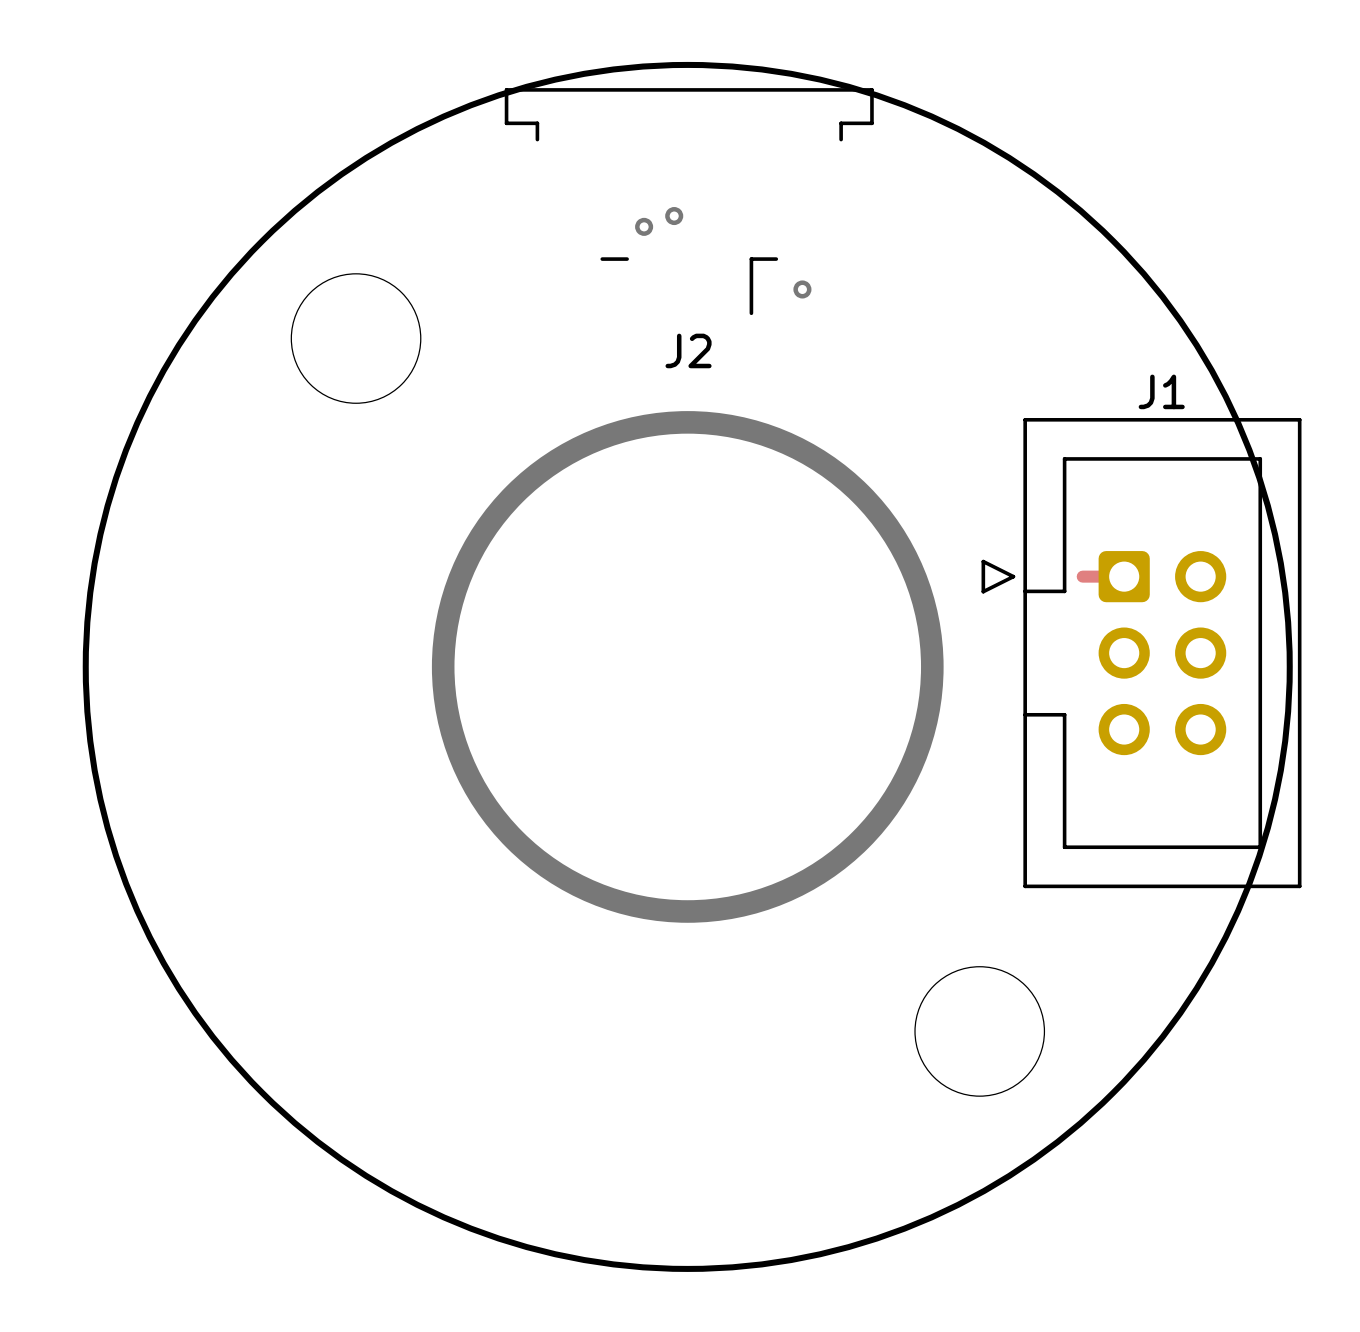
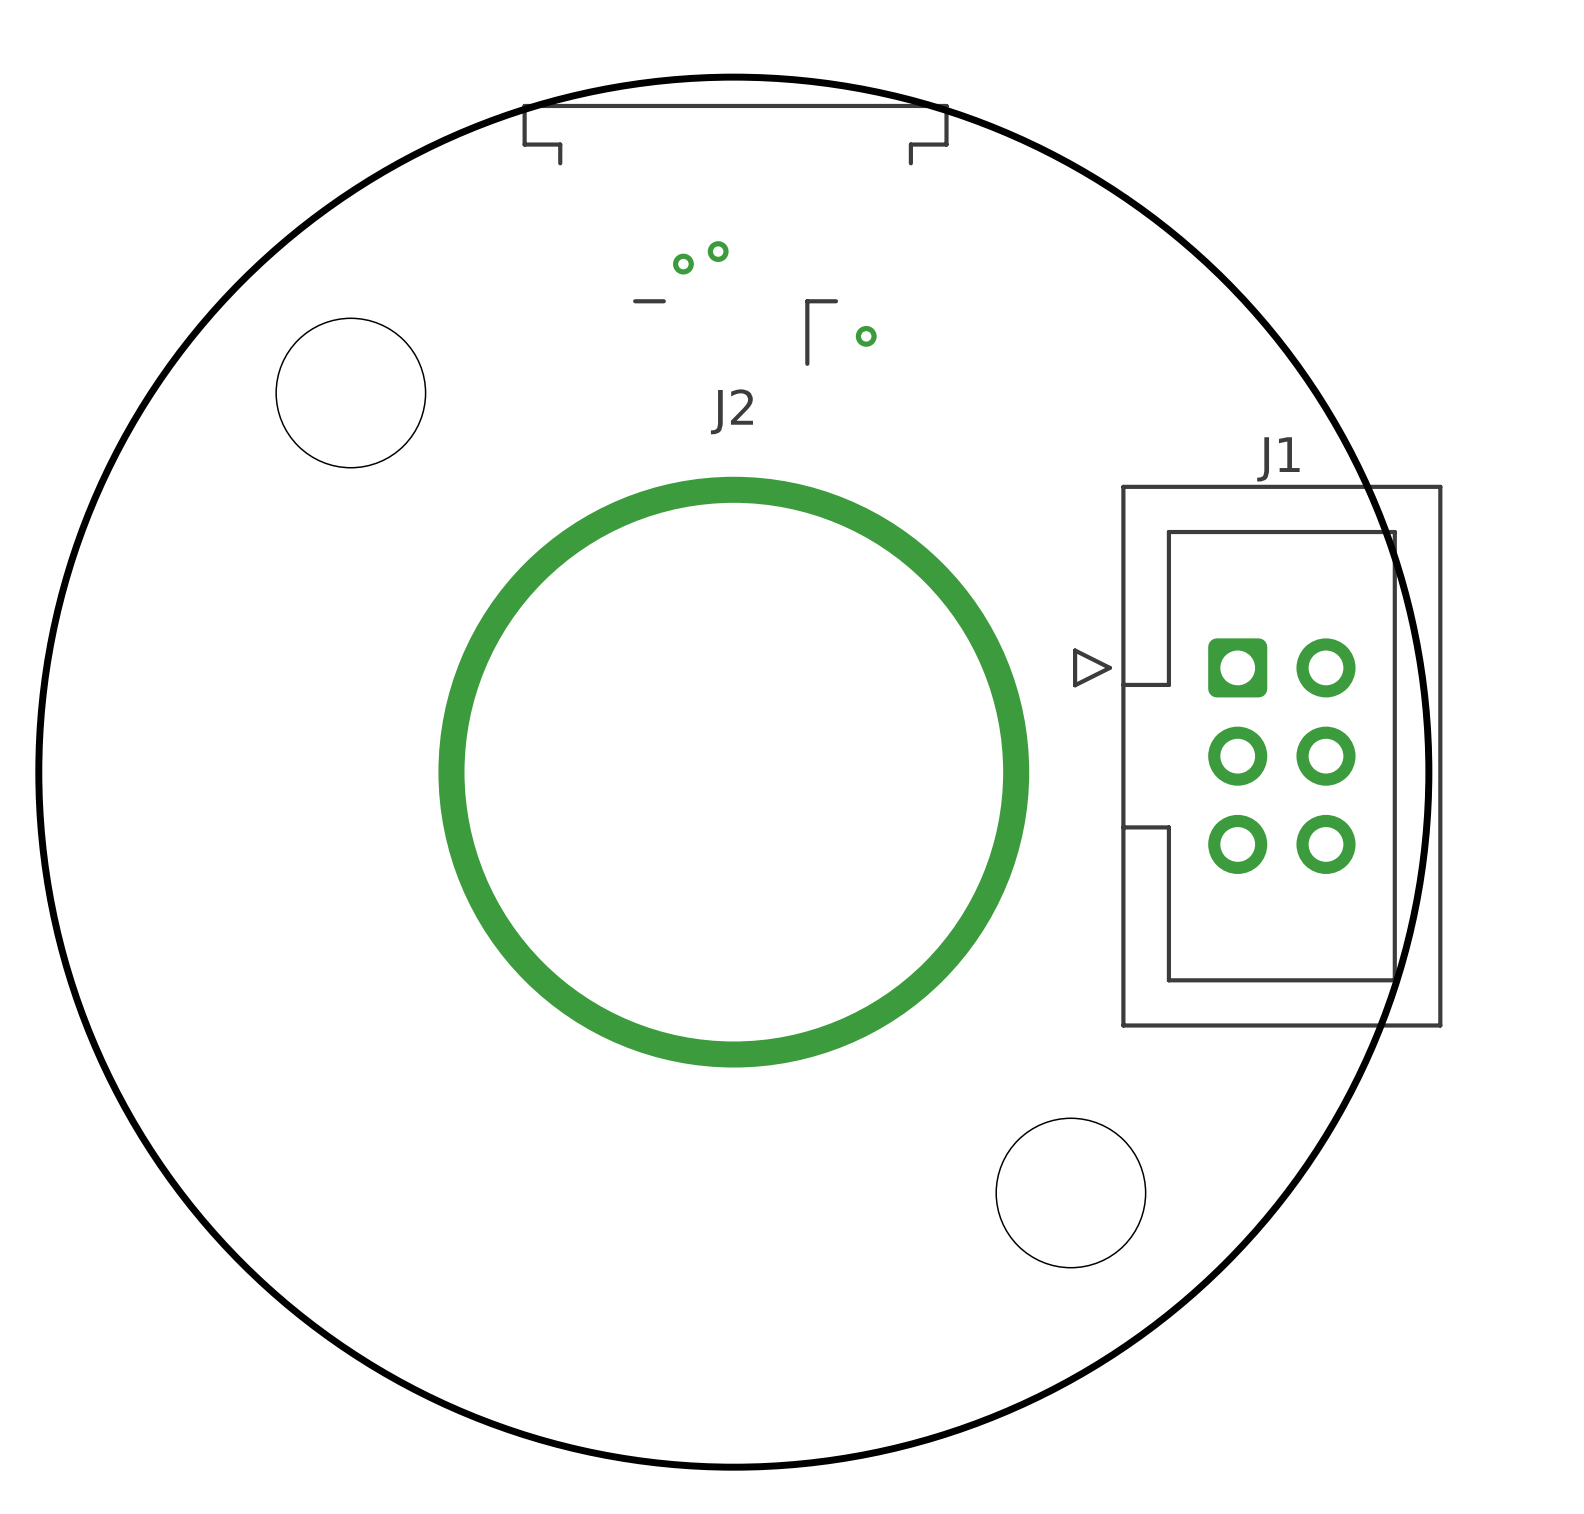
track: (1082, 576) (1124, 576) -> none

